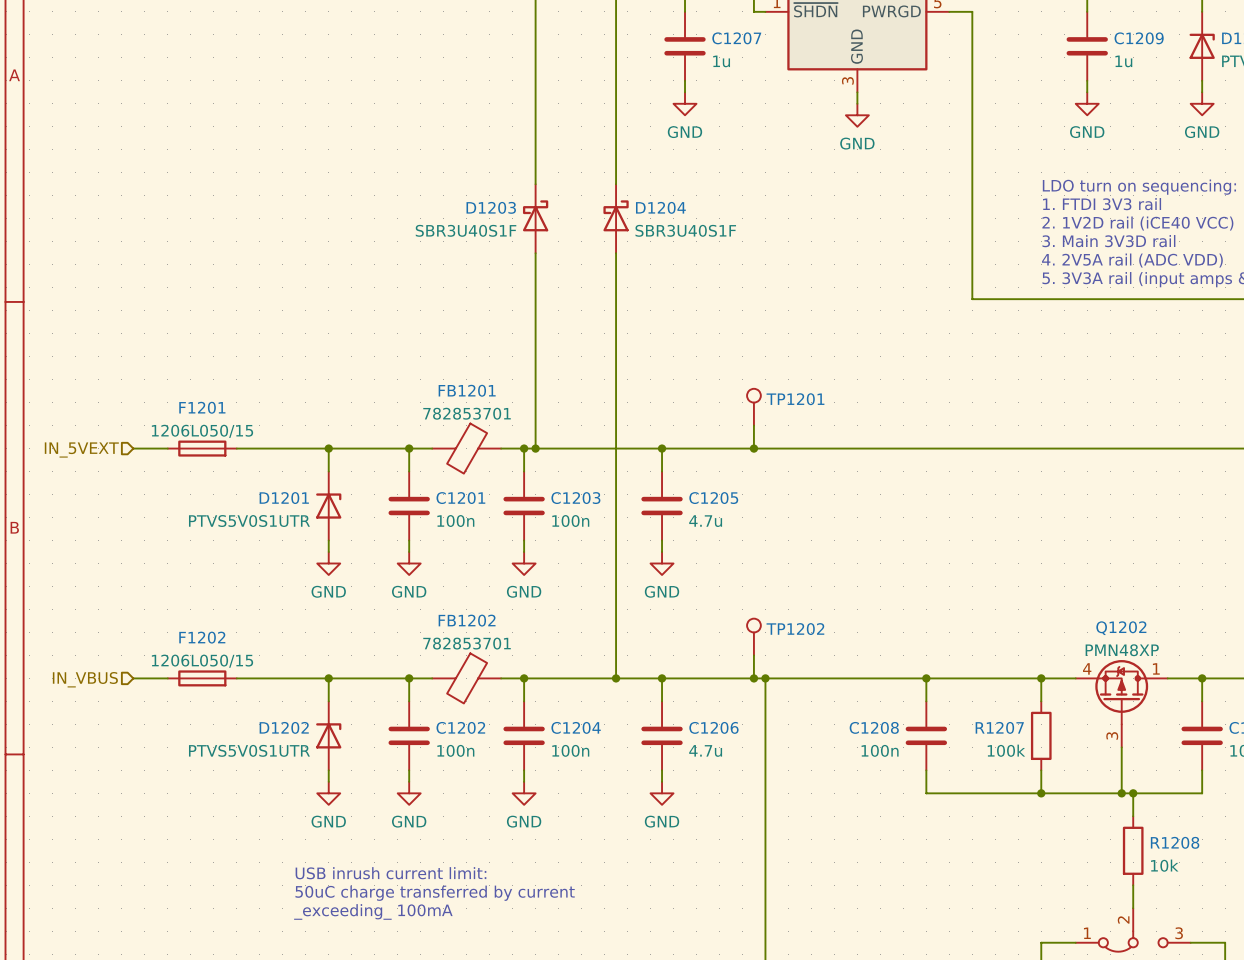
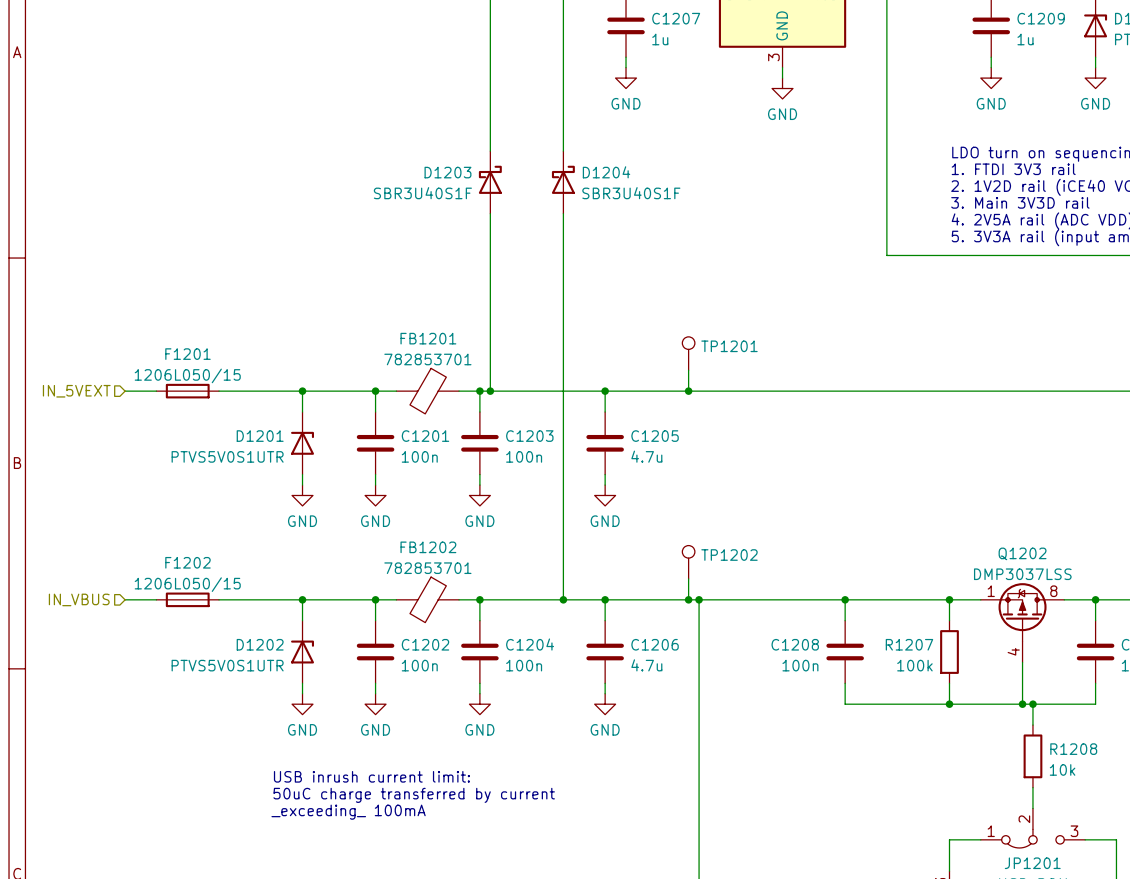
Q1202 value: PMN48XP (1122, 650) -> DMP3037LSS (1022, 574)
Q1202 pin number: 4 (1087, 668) -> 1 (991, 591)
Q1202 pin number: 1 (1156, 668) -> 8 (1053, 591)
Q1202 pin number: 3 (1112, 735) -> 4 (1013, 651)

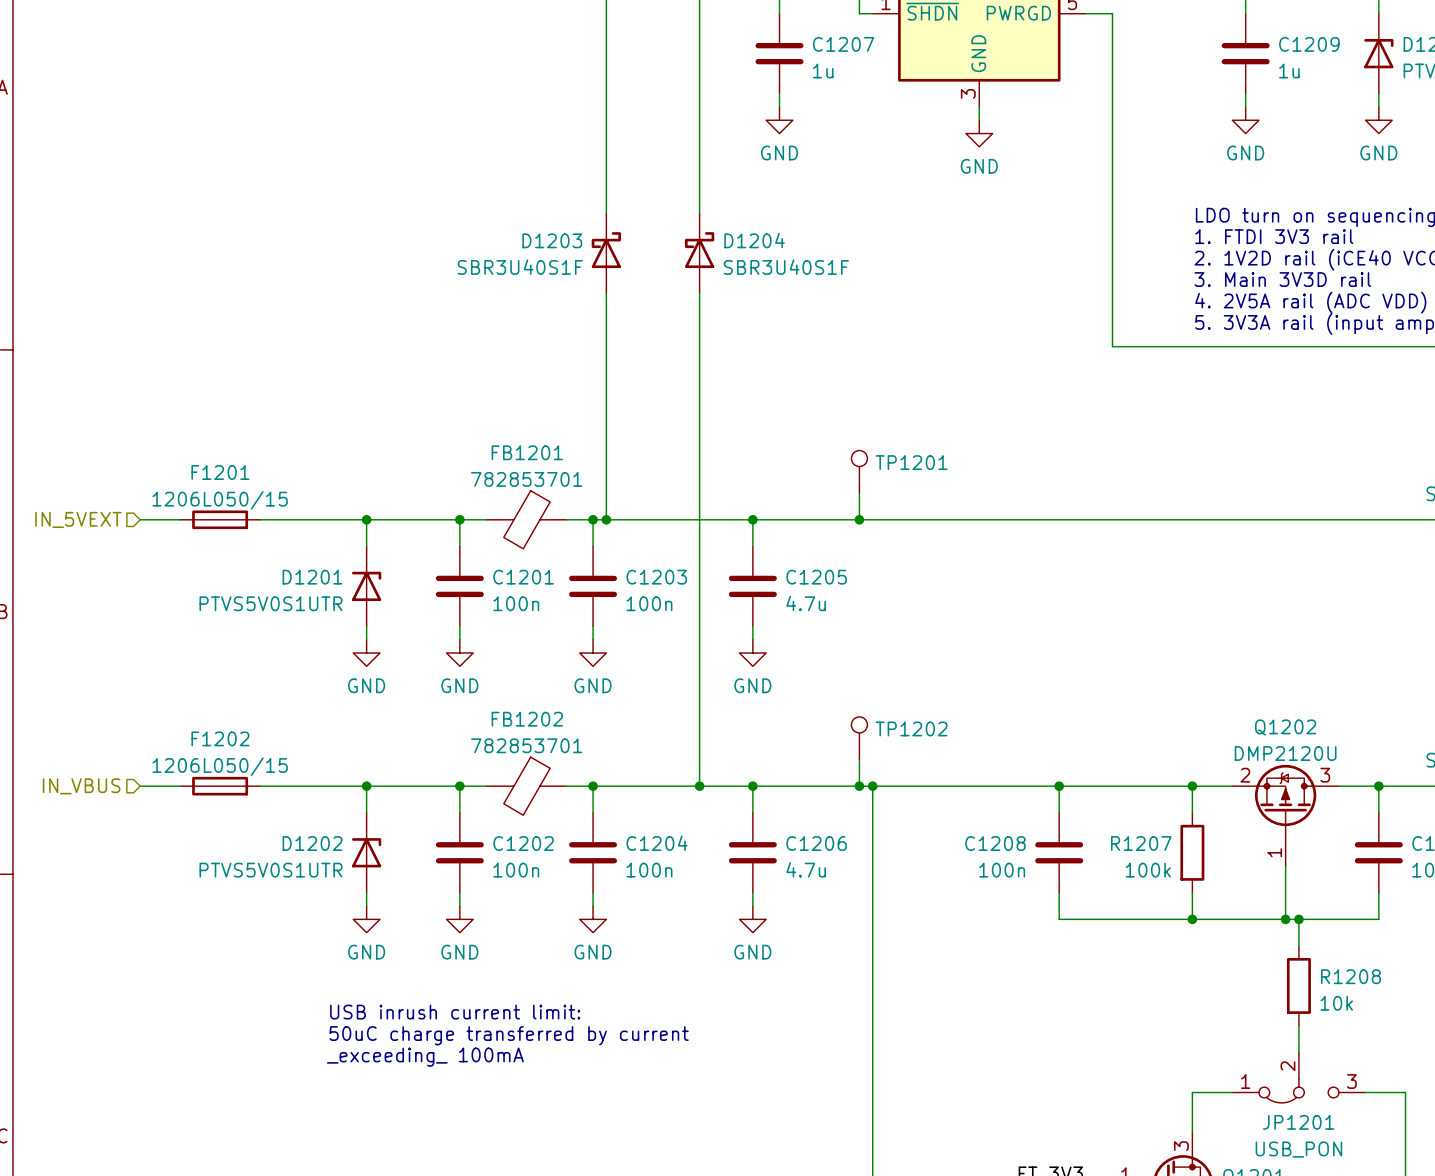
Q1202 value: DMP3037LSS (1022, 574) -> DMP2120U (1285, 753)
Q1202 pin number: 1 (991, 591) -> 2 (1245, 775)
Q1202 pin number: 8 (1053, 591) -> 3 (1325, 775)
Q1202 pin number: 4 (1013, 651) -> 1 (1274, 852)

